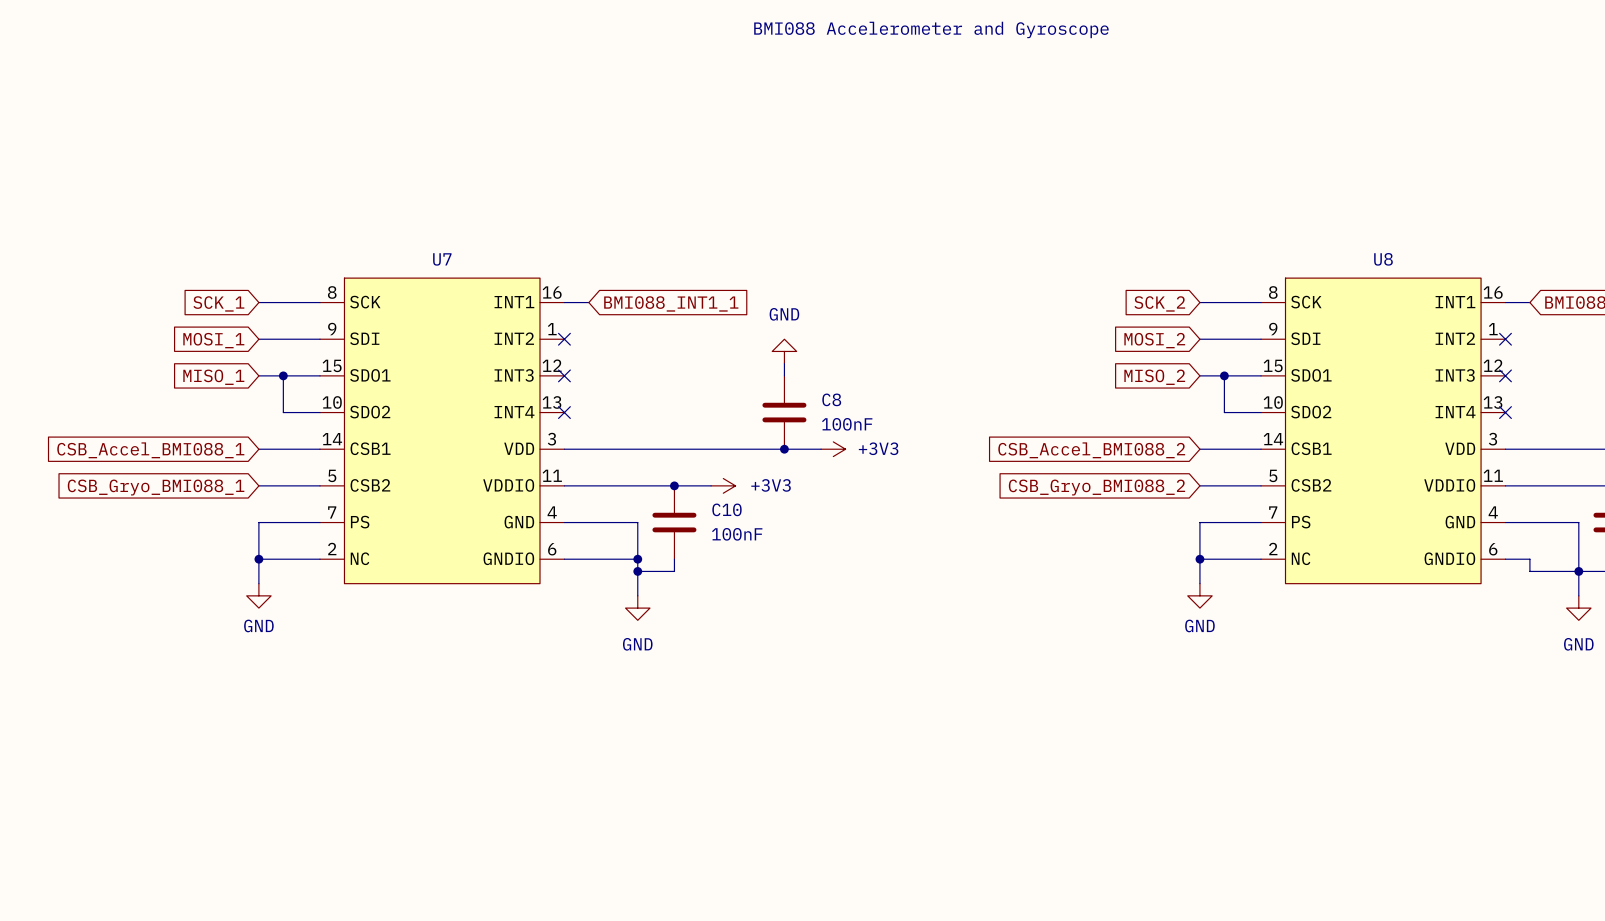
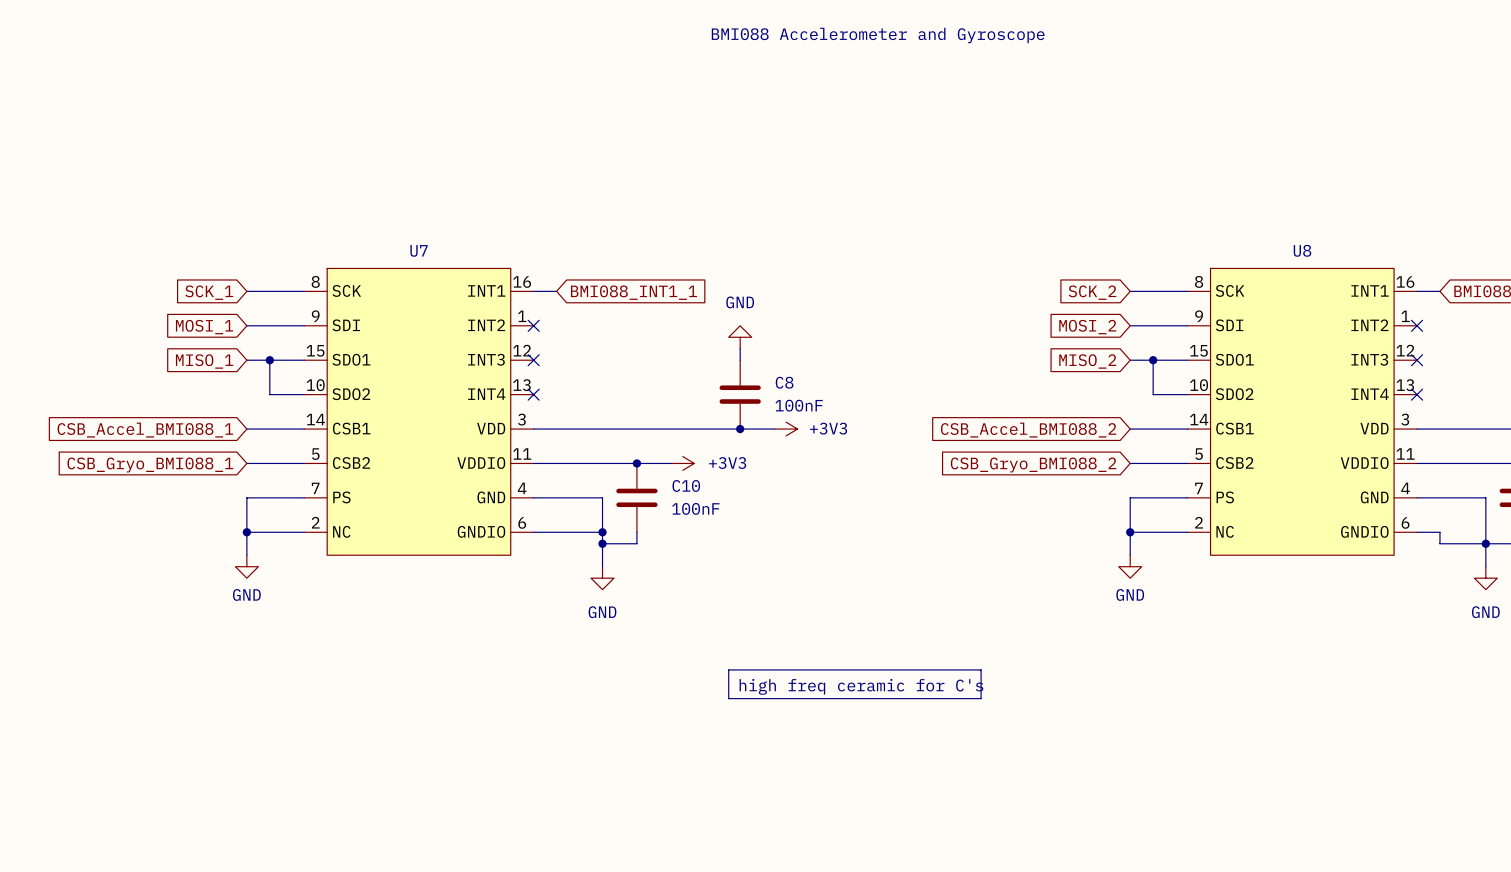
line: none -> (728, 669) (981, 669) (981, 698) (728, 698) (728, 669)
text: none -> high freq ceramic for C's (861, 686)

